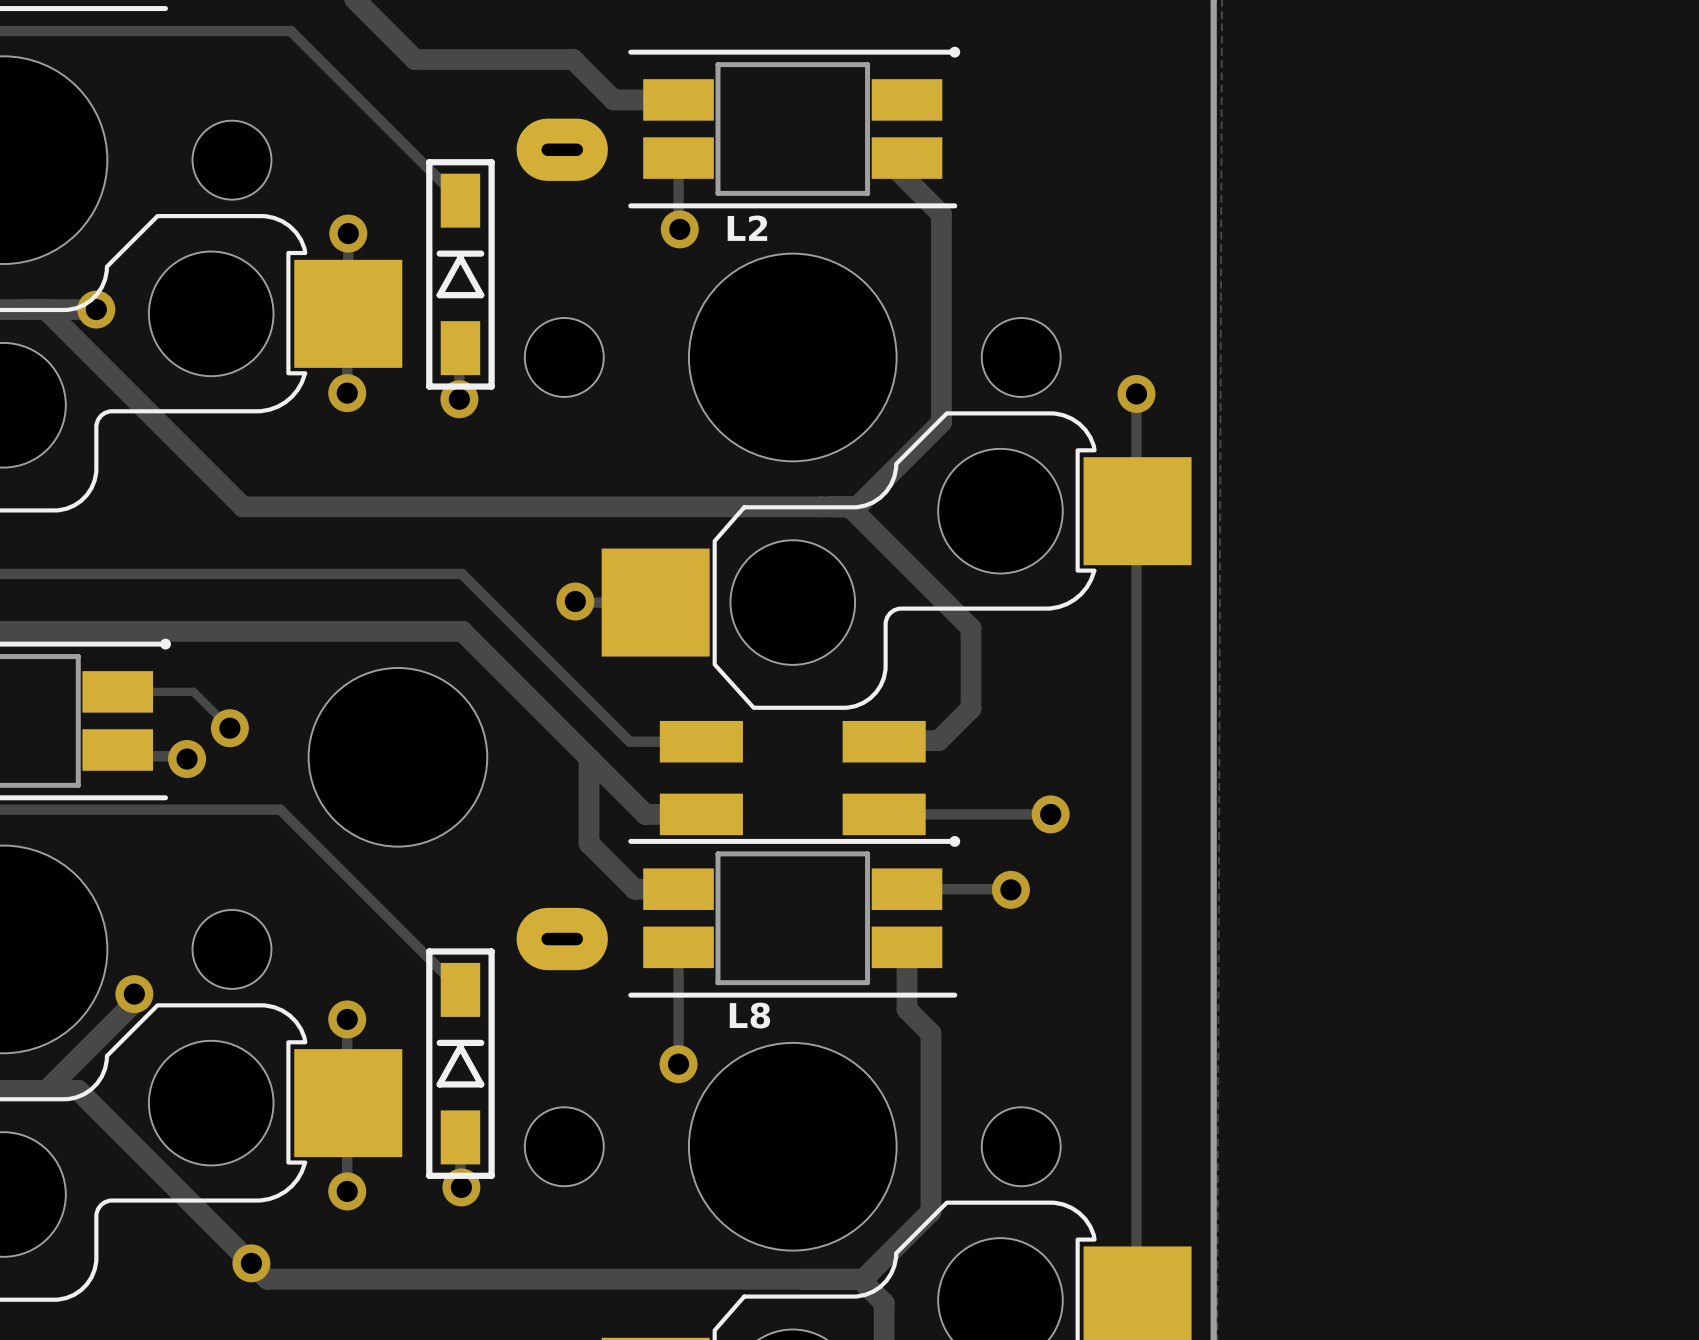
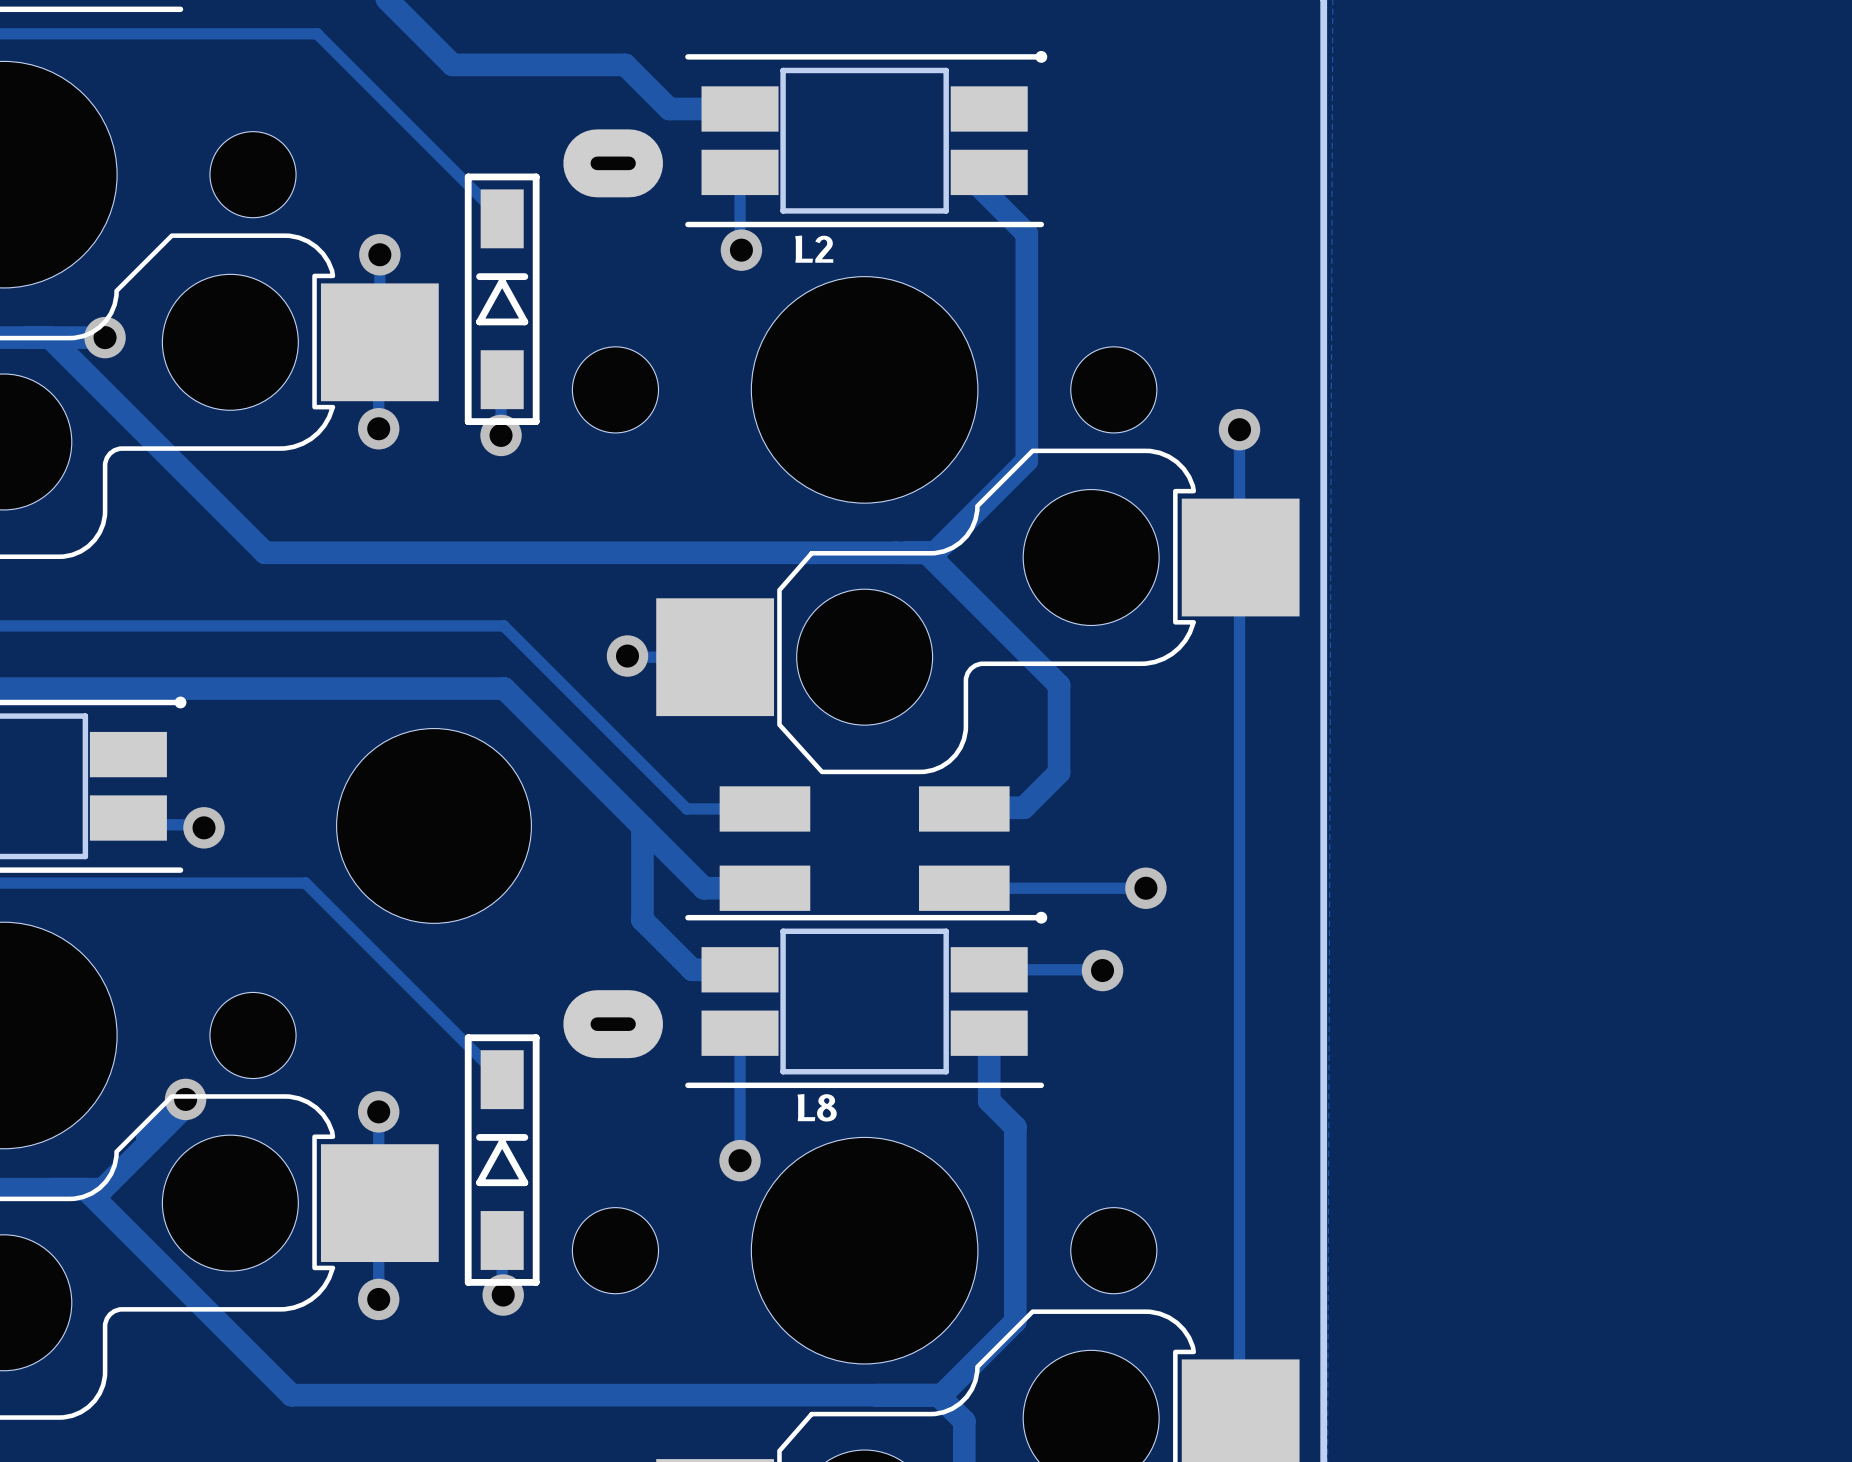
track: (117, 691) (193, 691) (229, 728) -> none
via: (229, 728) -> none
via position: (134, 994) -> (185, 1099)
track: (135, 995) (134, 1002) (46, 1090) -> none
track: none -> (147, 1138) (185, 1099) (185, 1106) (102, 1189) (85, 1189)
via: (251, 1263) -> none

